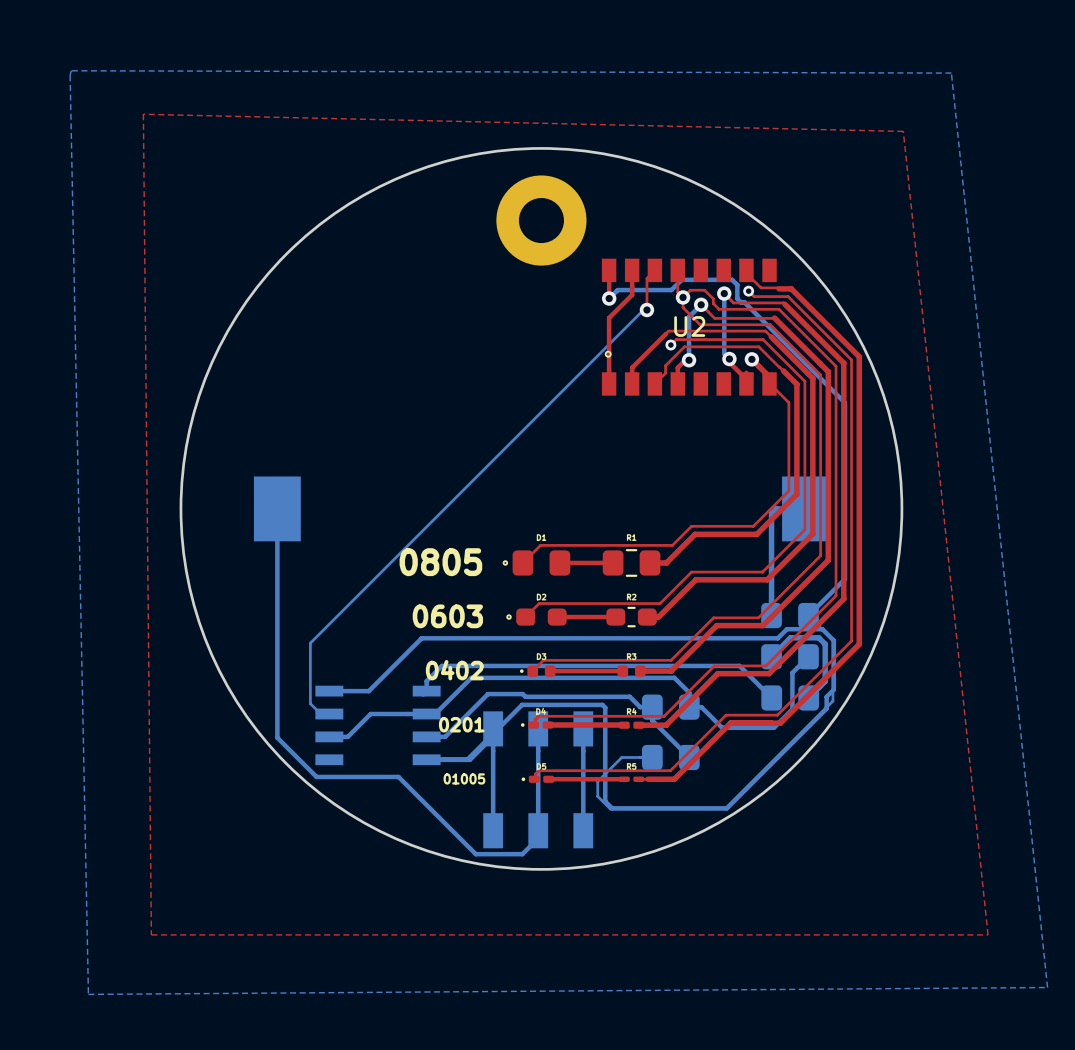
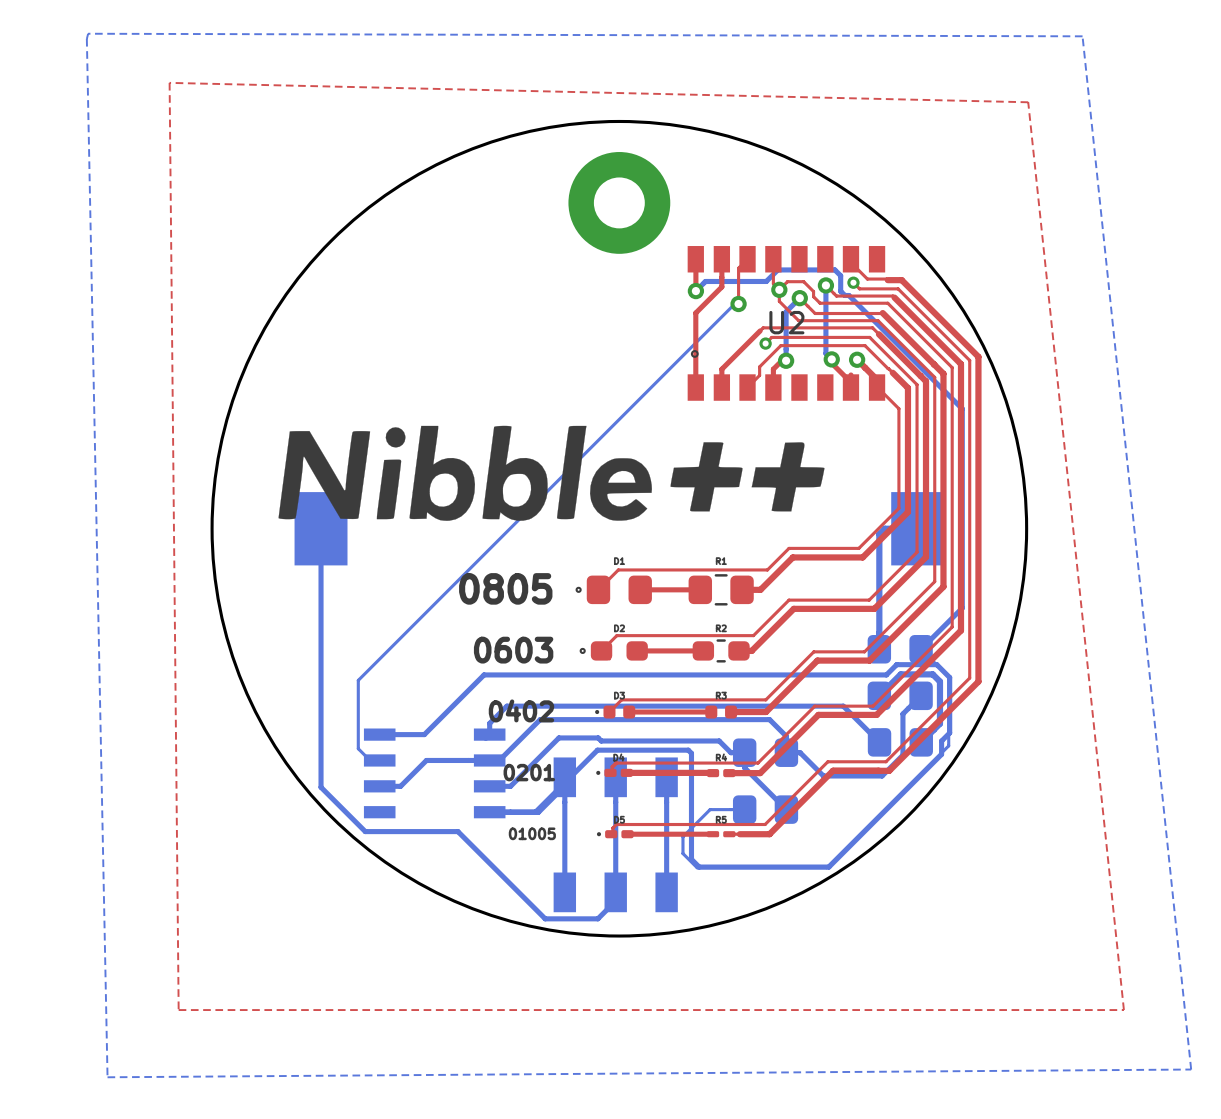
drawing: none -> [278, 425, 825, 521]

